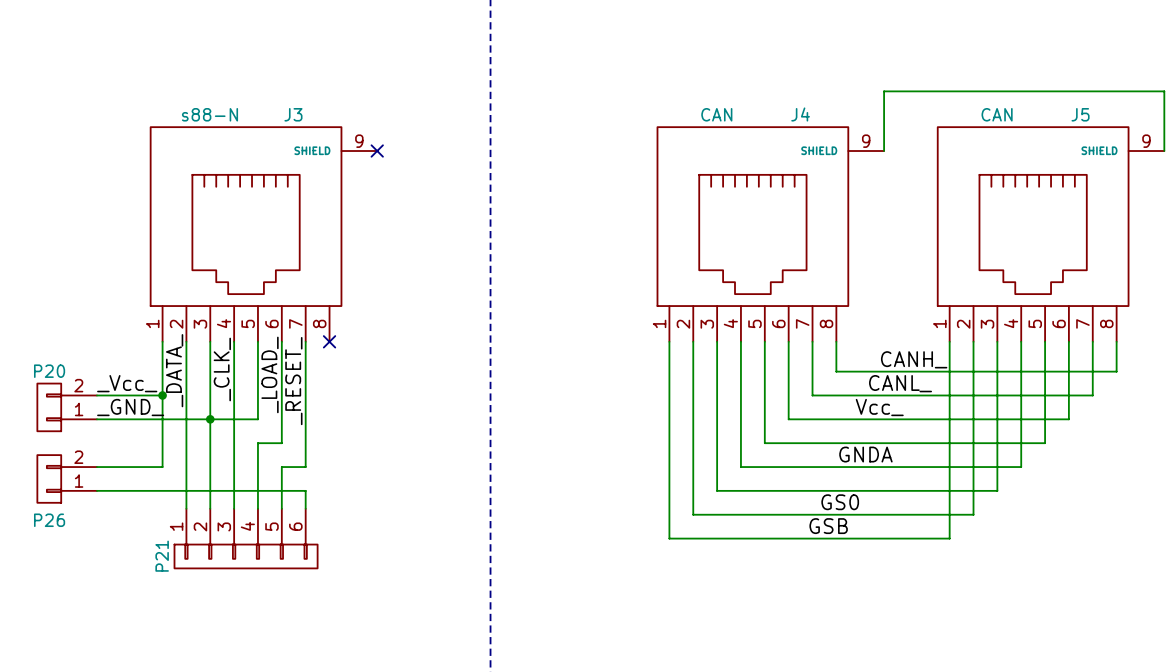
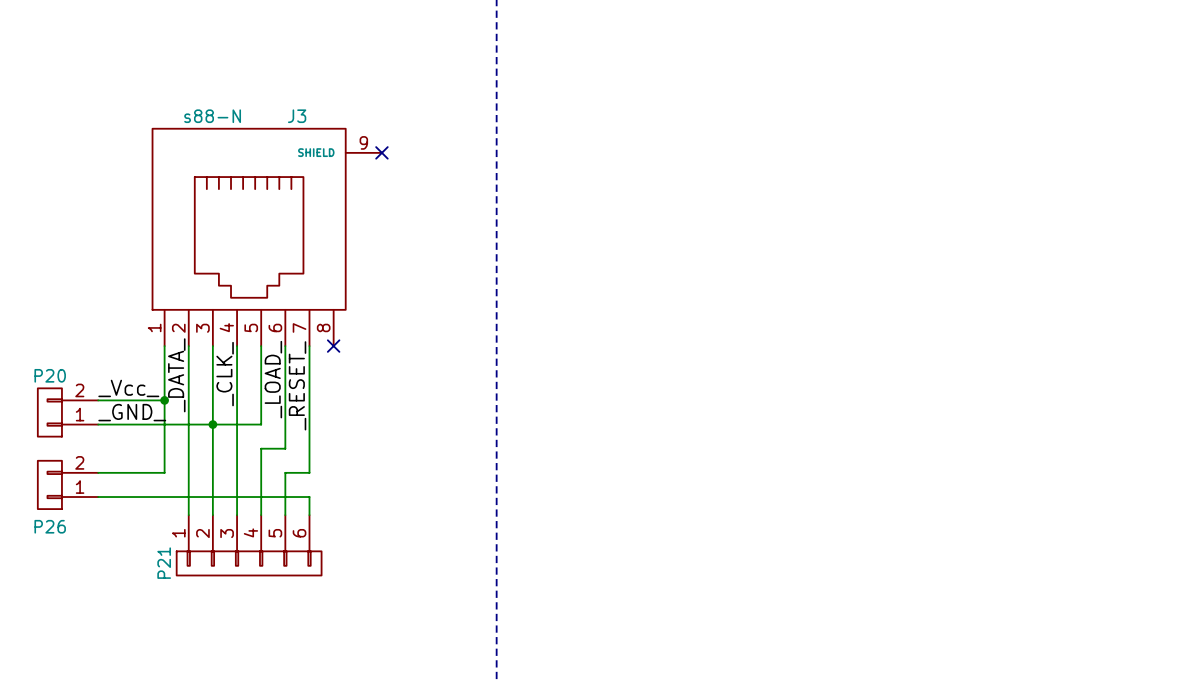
wire: (884, 151) (884, 91) (1164, 91) (1164, 151) -> none
J4: CAN (770, 234) -> none
J5: CAN (1051, 234) -> none
wire: (669, 341) (669, 538) (949, 538) (949, 341) -> none
wire: (693, 341) (693, 514) (973, 514) (973, 341) -> none
wire: (717, 341) (717, 490) (997, 490) (997, 341) -> none
wire: (740, 341) (740, 467) (1021, 467) (1021, 341) -> none
wire: (764, 341) (764, 443) (1045, 443) (1045, 341) -> none
wire: (788, 341) (788, 419) (1068, 419) (1068, 341) -> none
wire: (812, 341) (812, 395) (1092, 395) (1092, 341) -> none
wire: (836, 341) (836, 371) (1116, 371) (1116, 341) -> none
label: CANH_ (914, 359) -> none
label: CANL_ (900, 383) -> none
label: Vcc_ (879, 407) -> none
label: GNDA (865, 454) -> none
label: GS0 (840, 502) -> none
label: GSB (828, 526) -> none

